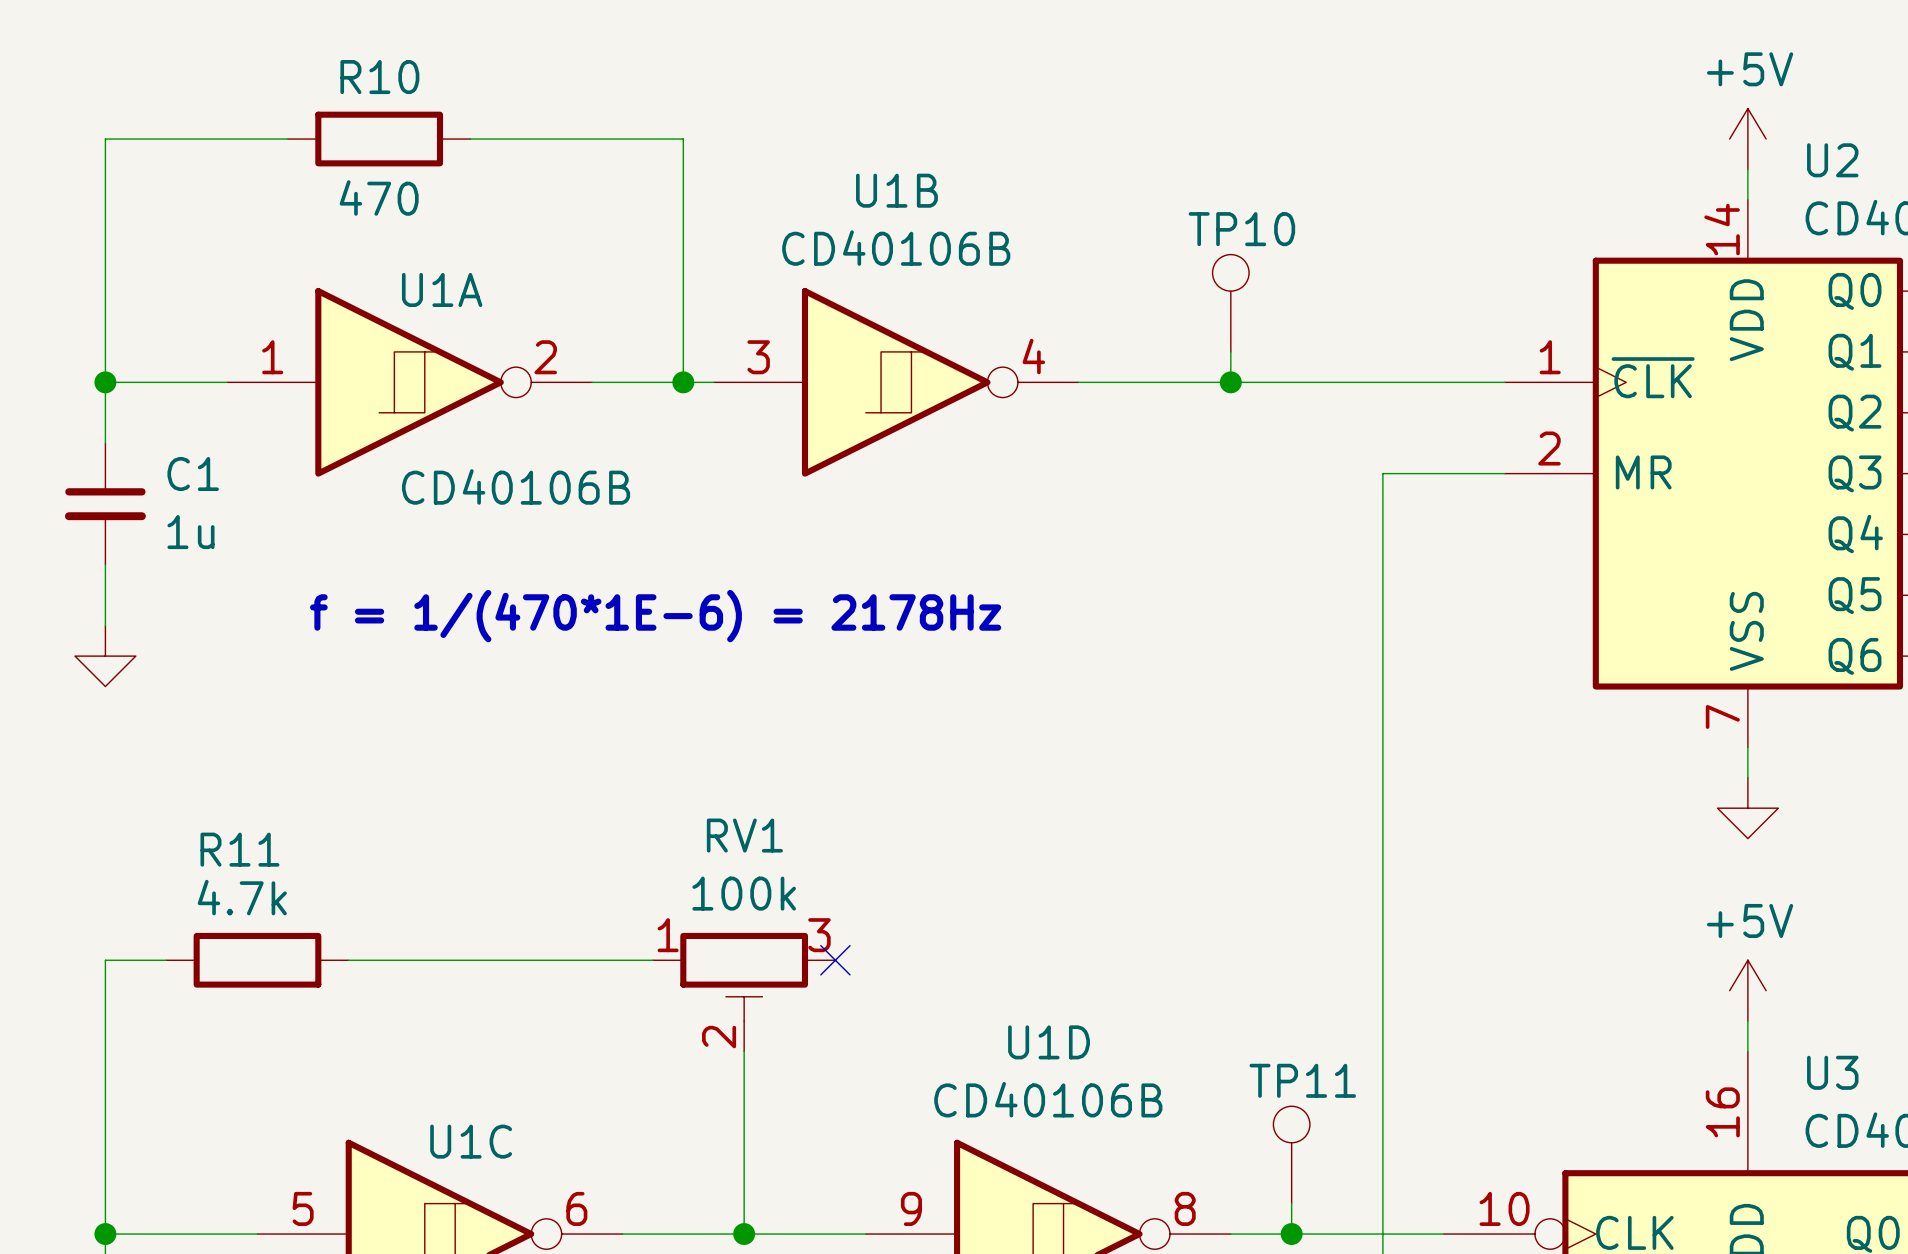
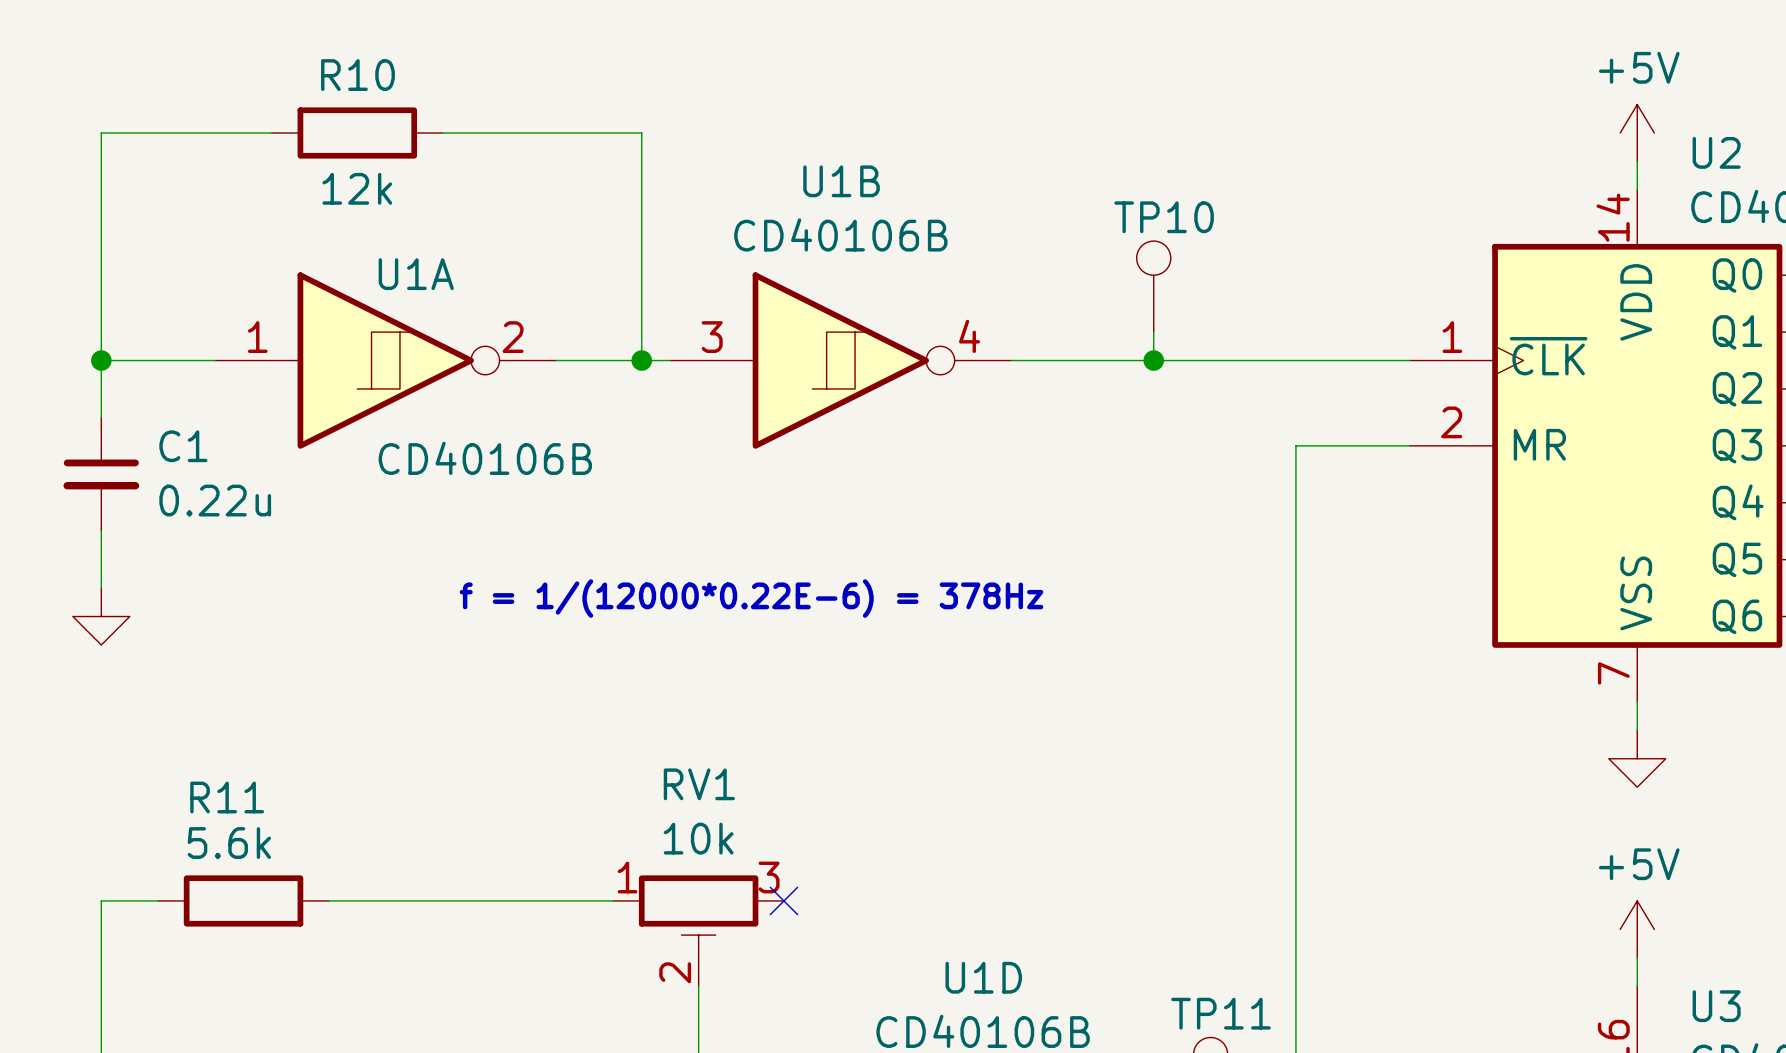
R10 value: 470 (379, 197) -> 12k (357, 188)
C1 value: 1u (190, 532) -> 0.22u (215, 500)
text: f = 1/(470*1E-6) = 2178Hz (655, 616) -> f = 1/(12000*0.22E-6) = 378Hz (751, 598)
RV1 value: 100k (744, 893) -> 10k (698, 838)
R11 value: 4.7k (242, 897) -> 5.6k (229, 843)

